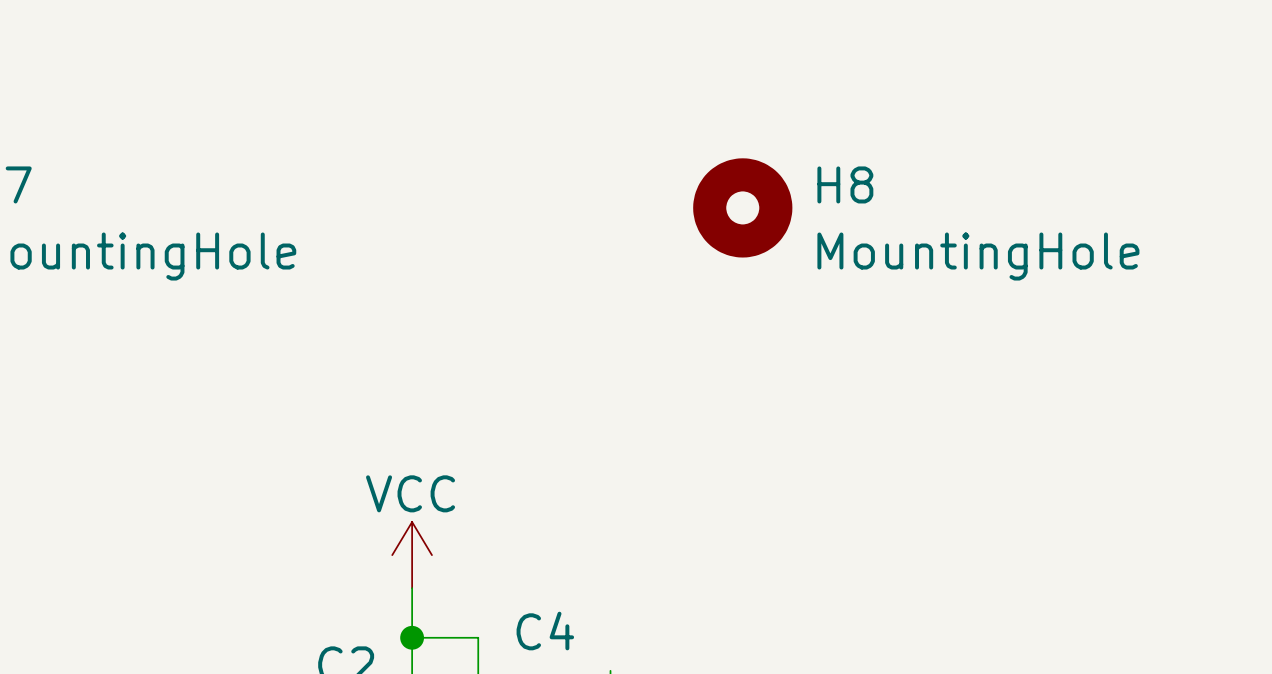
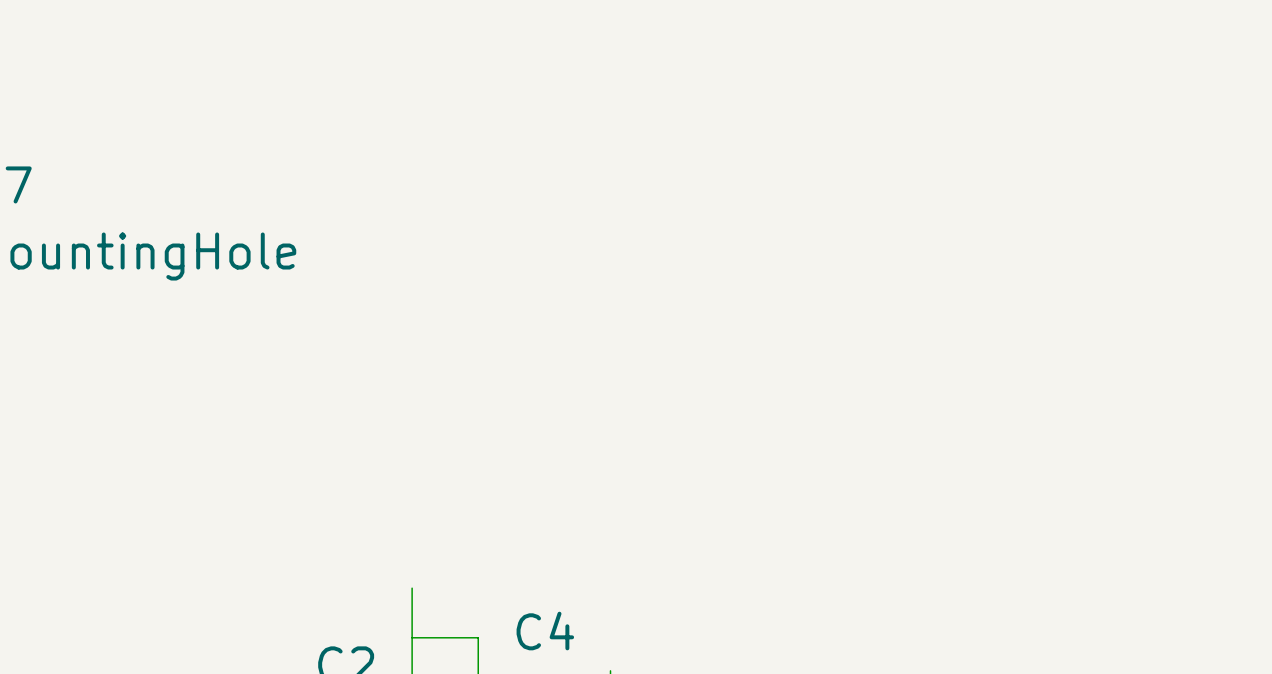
H8: MountingHole (742, 207) -> none
power symbol: VCC (412, 555) -> none
junction: (412, 637) -> none

